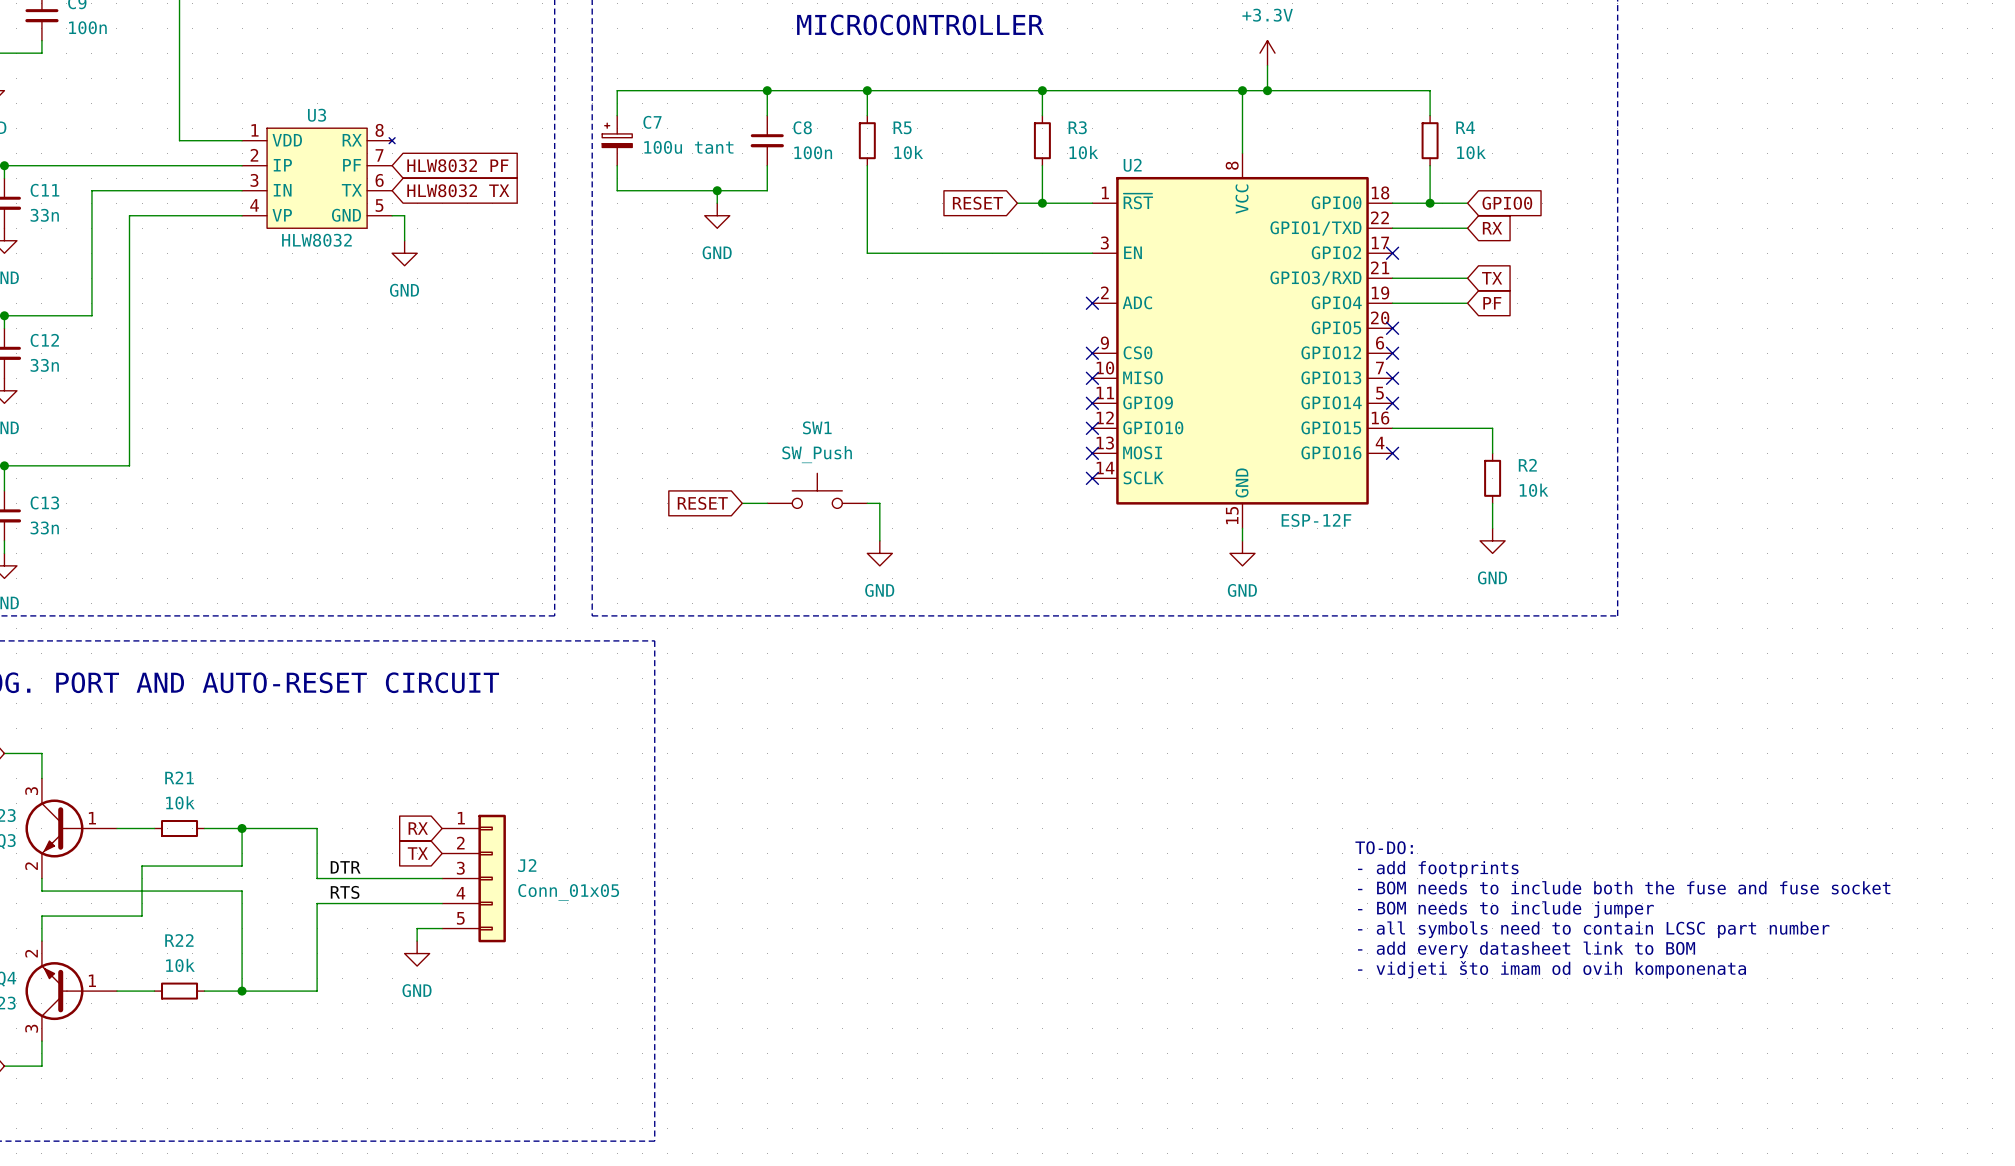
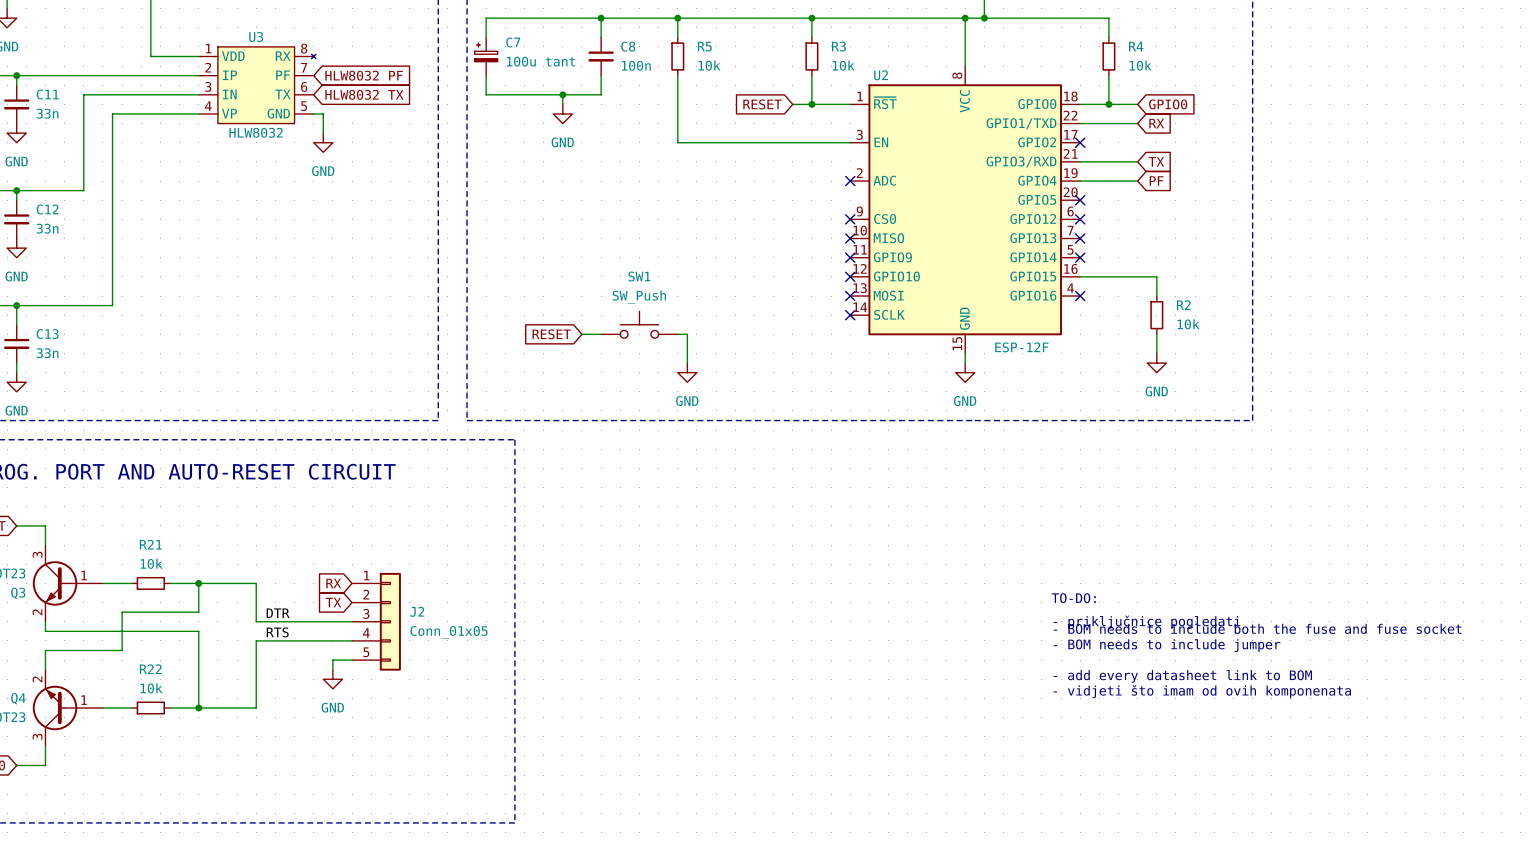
text: - add footprints (1438, 869) -> none
text: none -> - priključnice pogledati (1147, 622)
text: - all symbols need to contain LCSC part number (1593, 929) -> none

